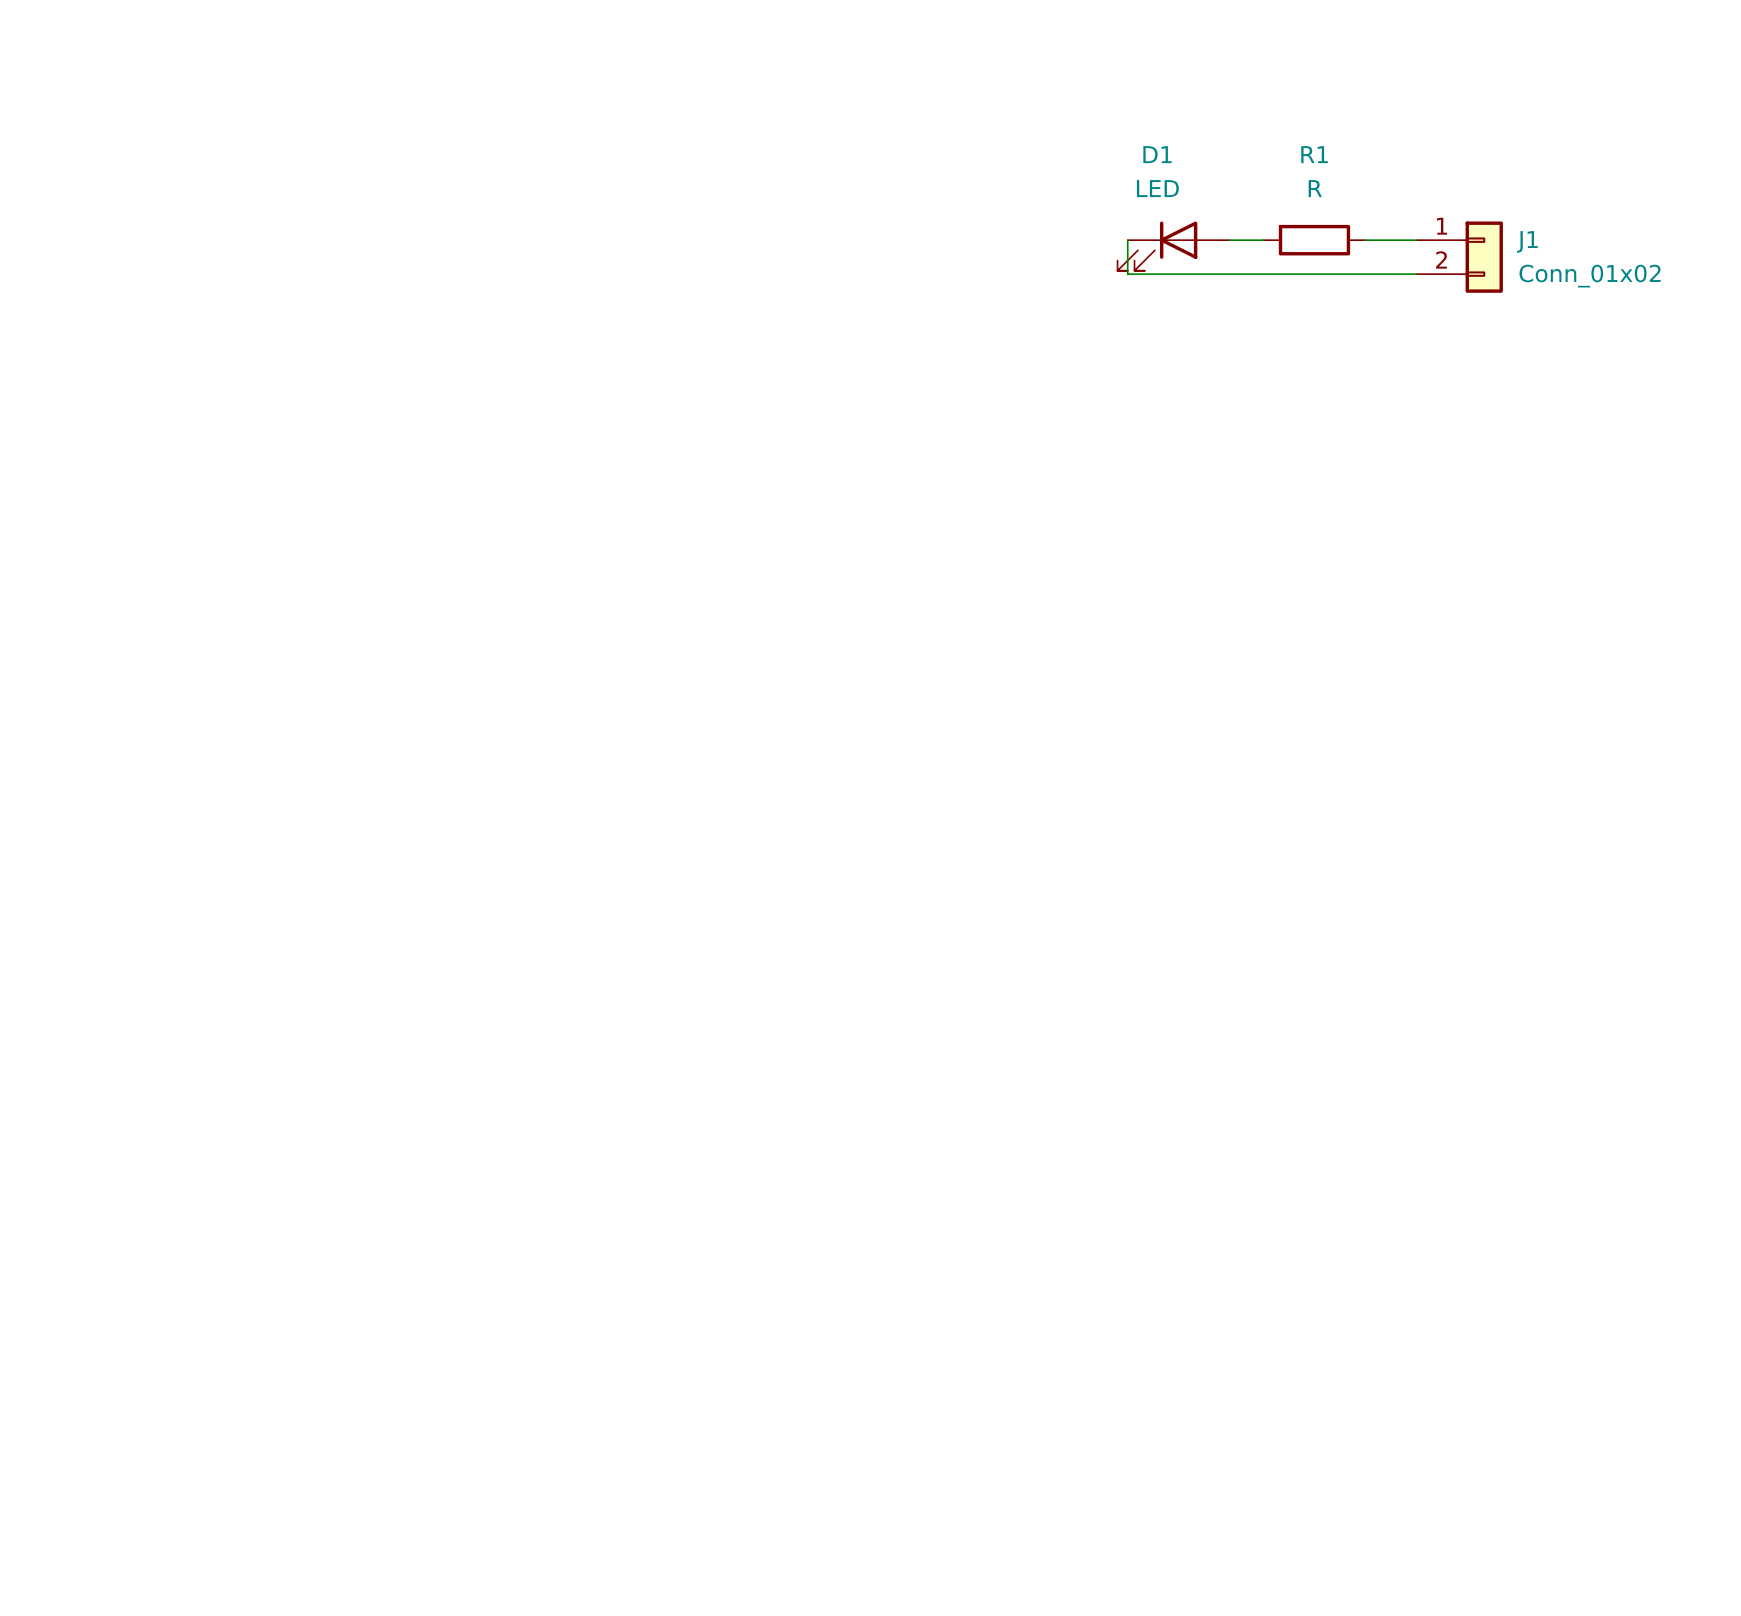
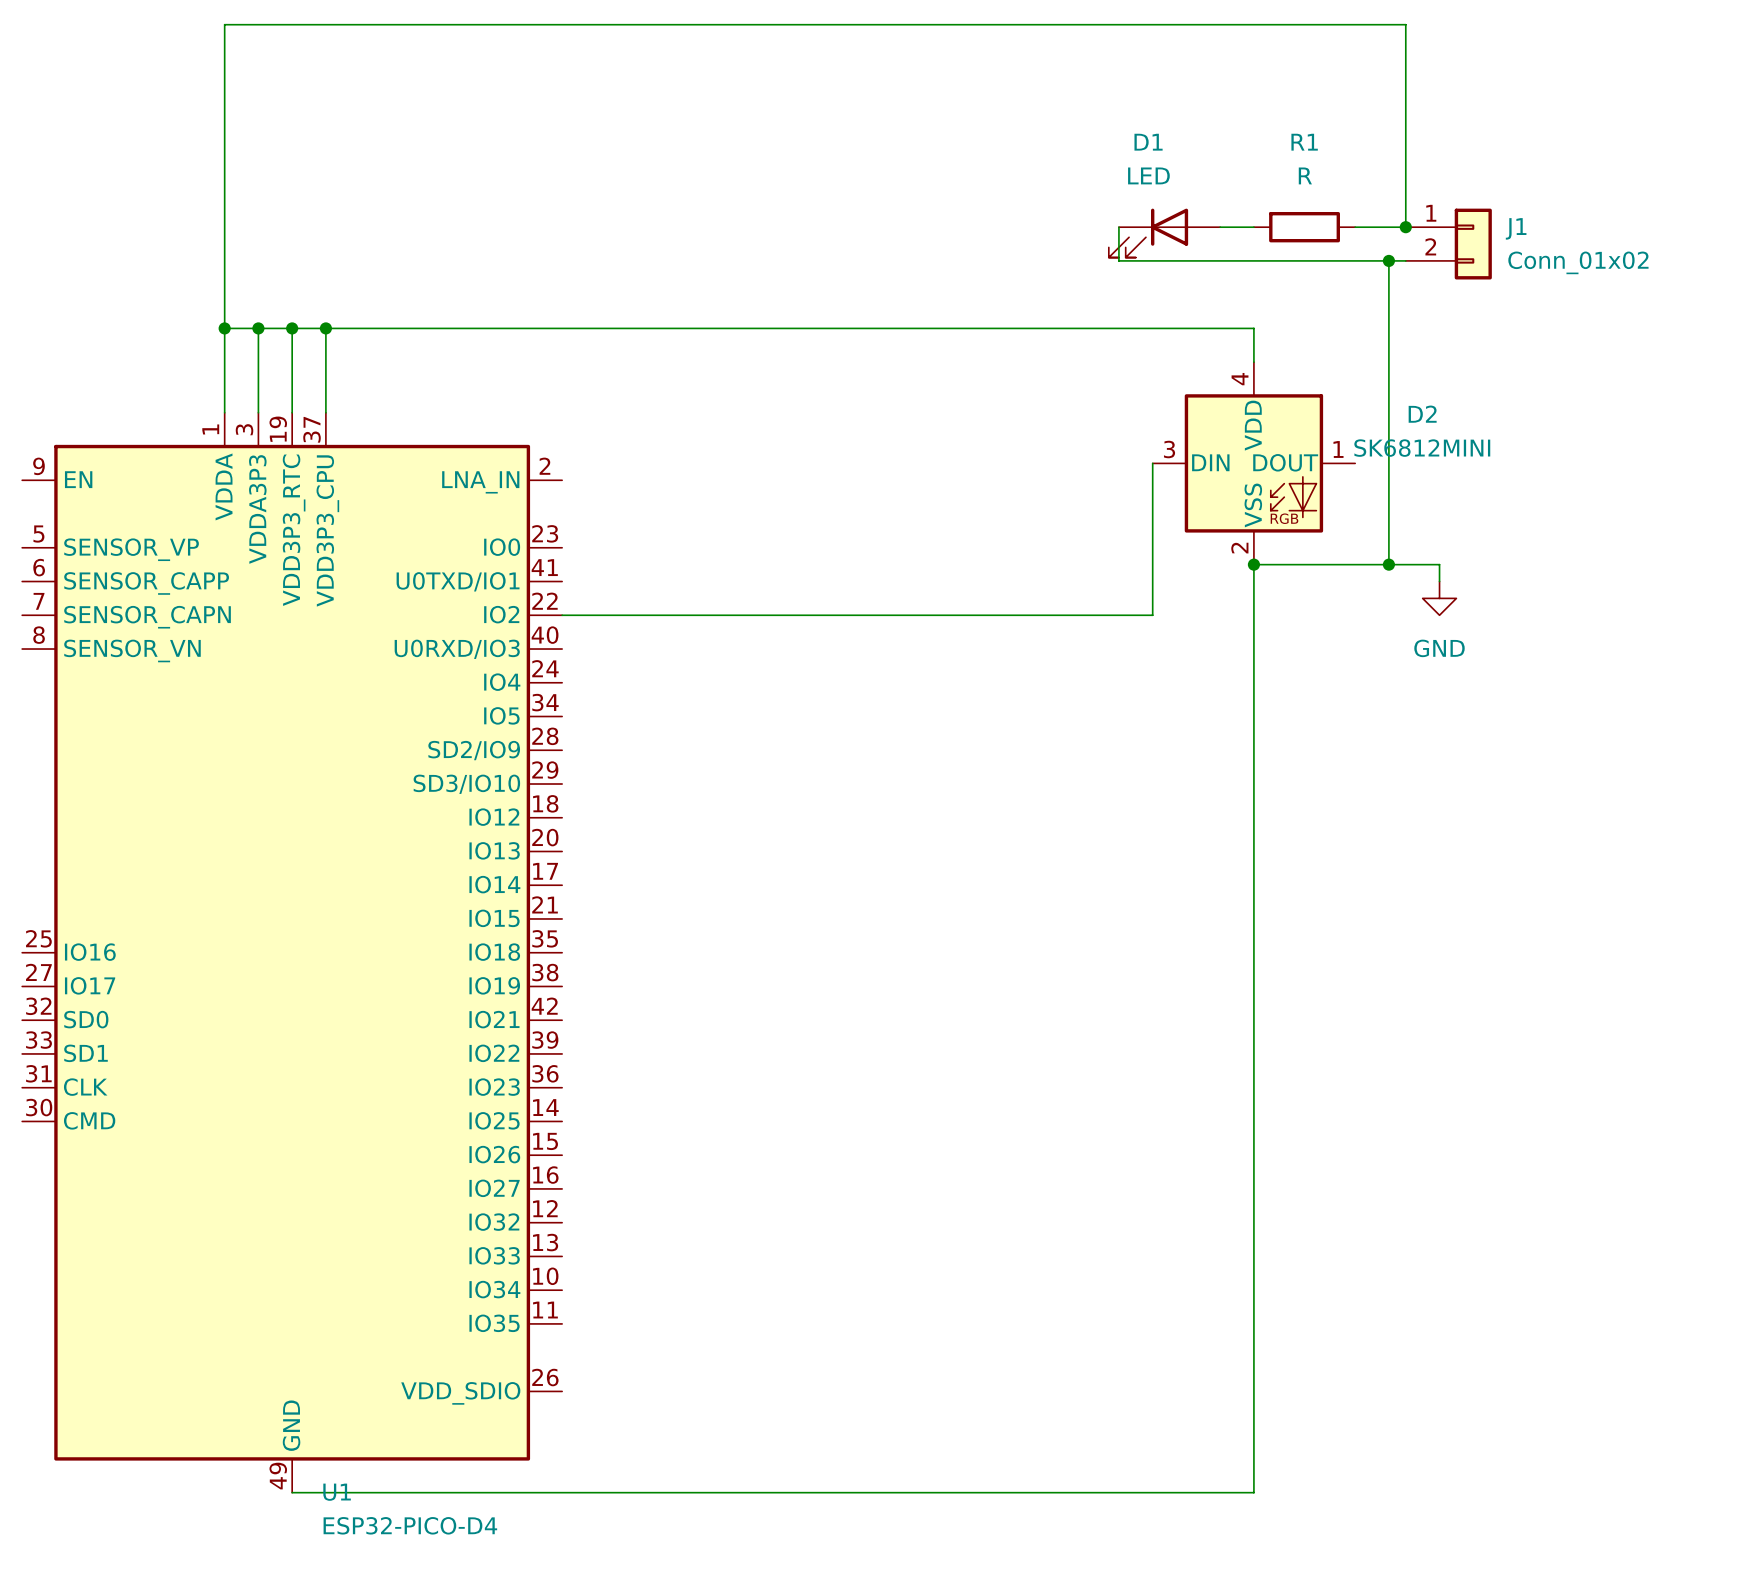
wire: none -> (1405, 227) (1405, 24) (224, 24) (224, 412)
junction: none -> (1405, 227)
wire: none -> (1388, 260) (1388, 564)
junction: none -> (1388, 260)
wire: none -> (224, 328) (1253, 328) (1253, 362)
junction: none -> (224, 328)
wire: none -> (258, 328) (258, 412)
junction: none -> (258, 328)
wire: none -> (292, 328) (292, 412)
junction: none -> (292, 328)
wire: none -> (325, 328) (325, 412)
junction: none -> (325, 328)
wire: none -> (1152, 463) (1152, 615) (562, 615)
D2: none -> SK6812MINI (1253, 463)
junction: none -> (1253, 564)
junction: none -> (1388, 564)
wire: none -> (1439, 581) (1439, 564) (1253, 564) (1253, 1492) (292, 1492)
power symbol: none -> GND (1439, 598)
U1: none -> ESP32-PICO-D4 (292, 952)

